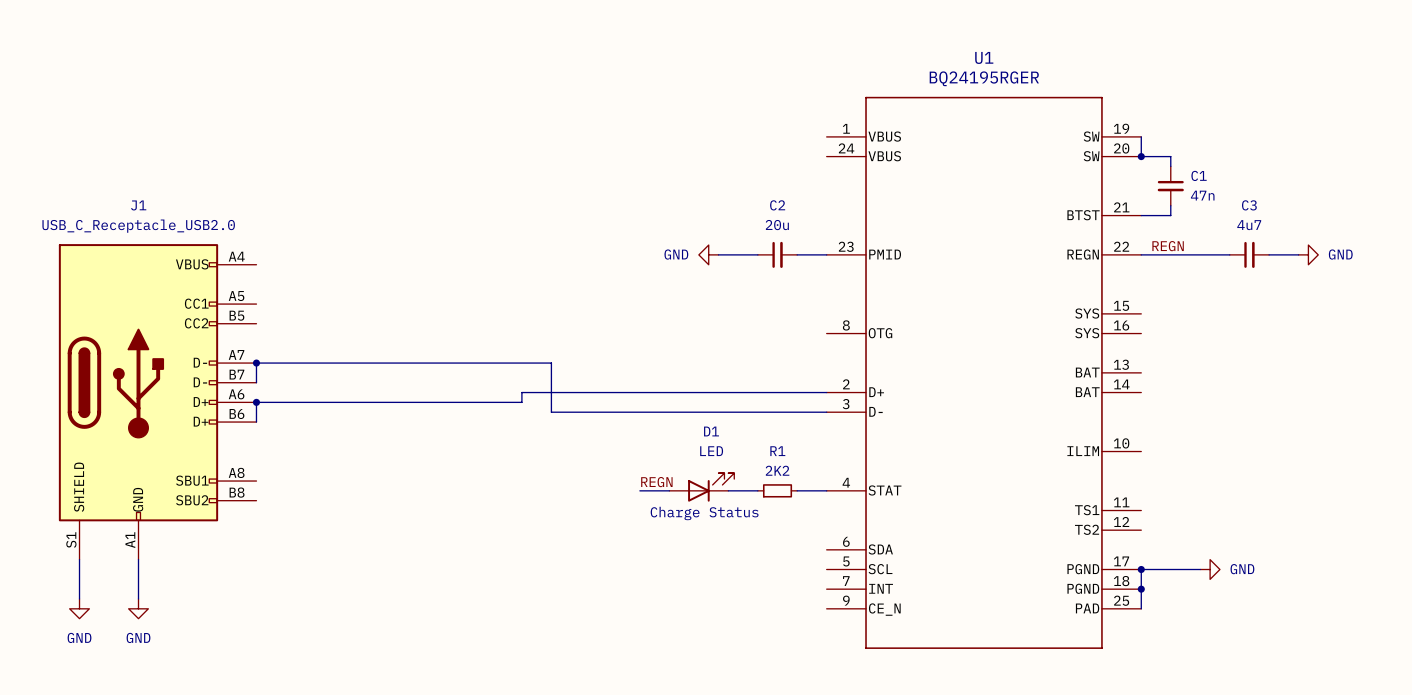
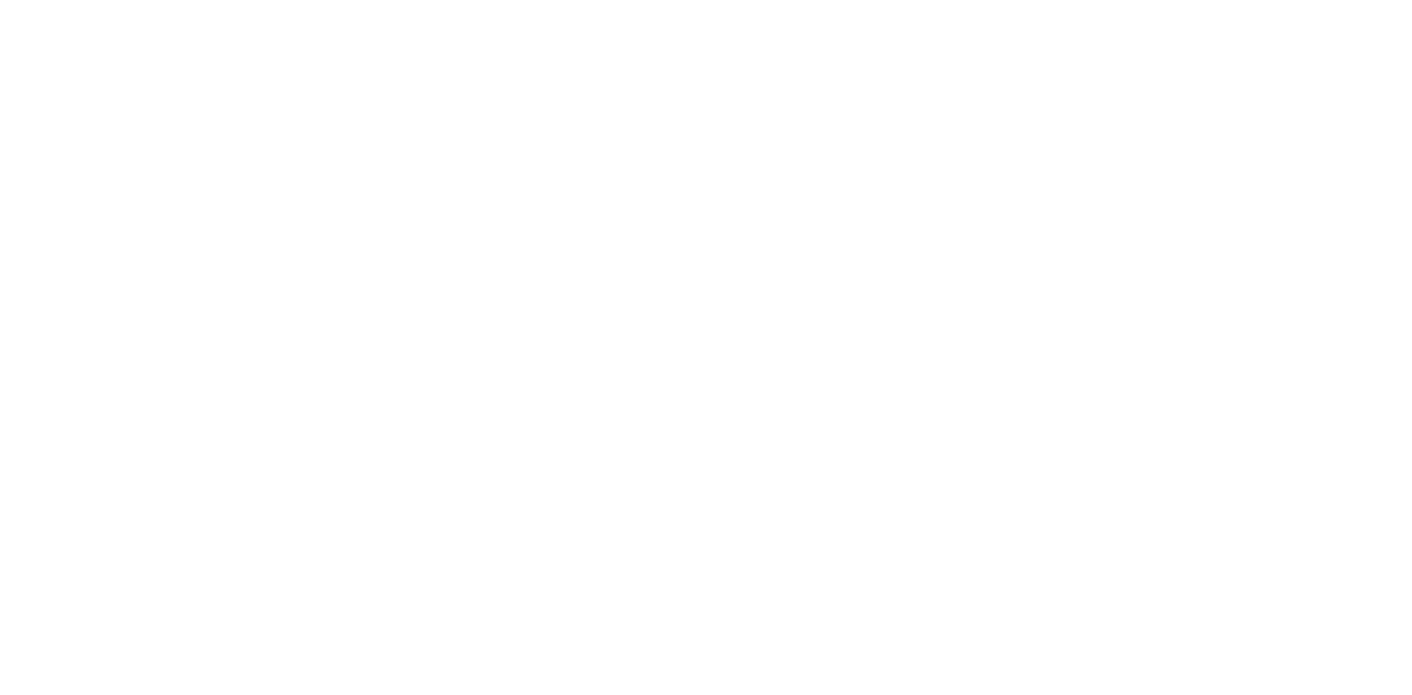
wire: (1141, 136) (1141, 156) (1170, 156) (1170, 166) -> none
junction: (1141, 156) -> none
C1: 47n (1170, 186) -> none
wire: (1170, 205) (1170, 215) (1141, 215) -> none
label: REGN (1168, 246) -> none
power symbol: GND (708, 254) -> none
wire: (718, 254) (757, 254) -> none
C2: 20u (777, 254) -> none
wire: (797, 254) (826, 254) -> none
wire: (1141, 254) (1229, 254) -> none
C3: 4u7 (1249, 254) -> none
wire: (1269, 254) (1298, 254) -> none
power symbol: GND (1308, 254) -> none
junction: (256, 363) -> none
U1: BQ24195RGER (983, 372) -> none
wire: (256, 382) (256, 363) (551, 363) (551, 412) (826, 412) -> none
wire: (826, 392) (521, 392) (521, 402) (256, 402) (256, 422) -> none
J1: USB_C_Receptacle_USB2.0 (157, 401) -> none
junction: (256, 402) -> none
label: REGN (656, 482) -> none
D1: LED (701, 487) -> none
wire: (639, 490) (669, 490) -> none
wire: (728, 490) (757, 490) -> none
R1: 2K2 (777, 490) -> none
wire: (797, 490) (826, 490) -> none
text: Charge Status (704, 513) -> none
wire: (79, 559) (79, 598) -> none
wire: (138, 559) (138, 598) -> none
junction: (1141, 569) -> none
wire: (1200, 569) (1141, 569) (1141, 608) -> none
power symbol: GND (1210, 569) -> none
junction: (1141, 589) -> none
power symbol: GND (79, 608) -> none
power symbol: GND (138, 608) -> none

